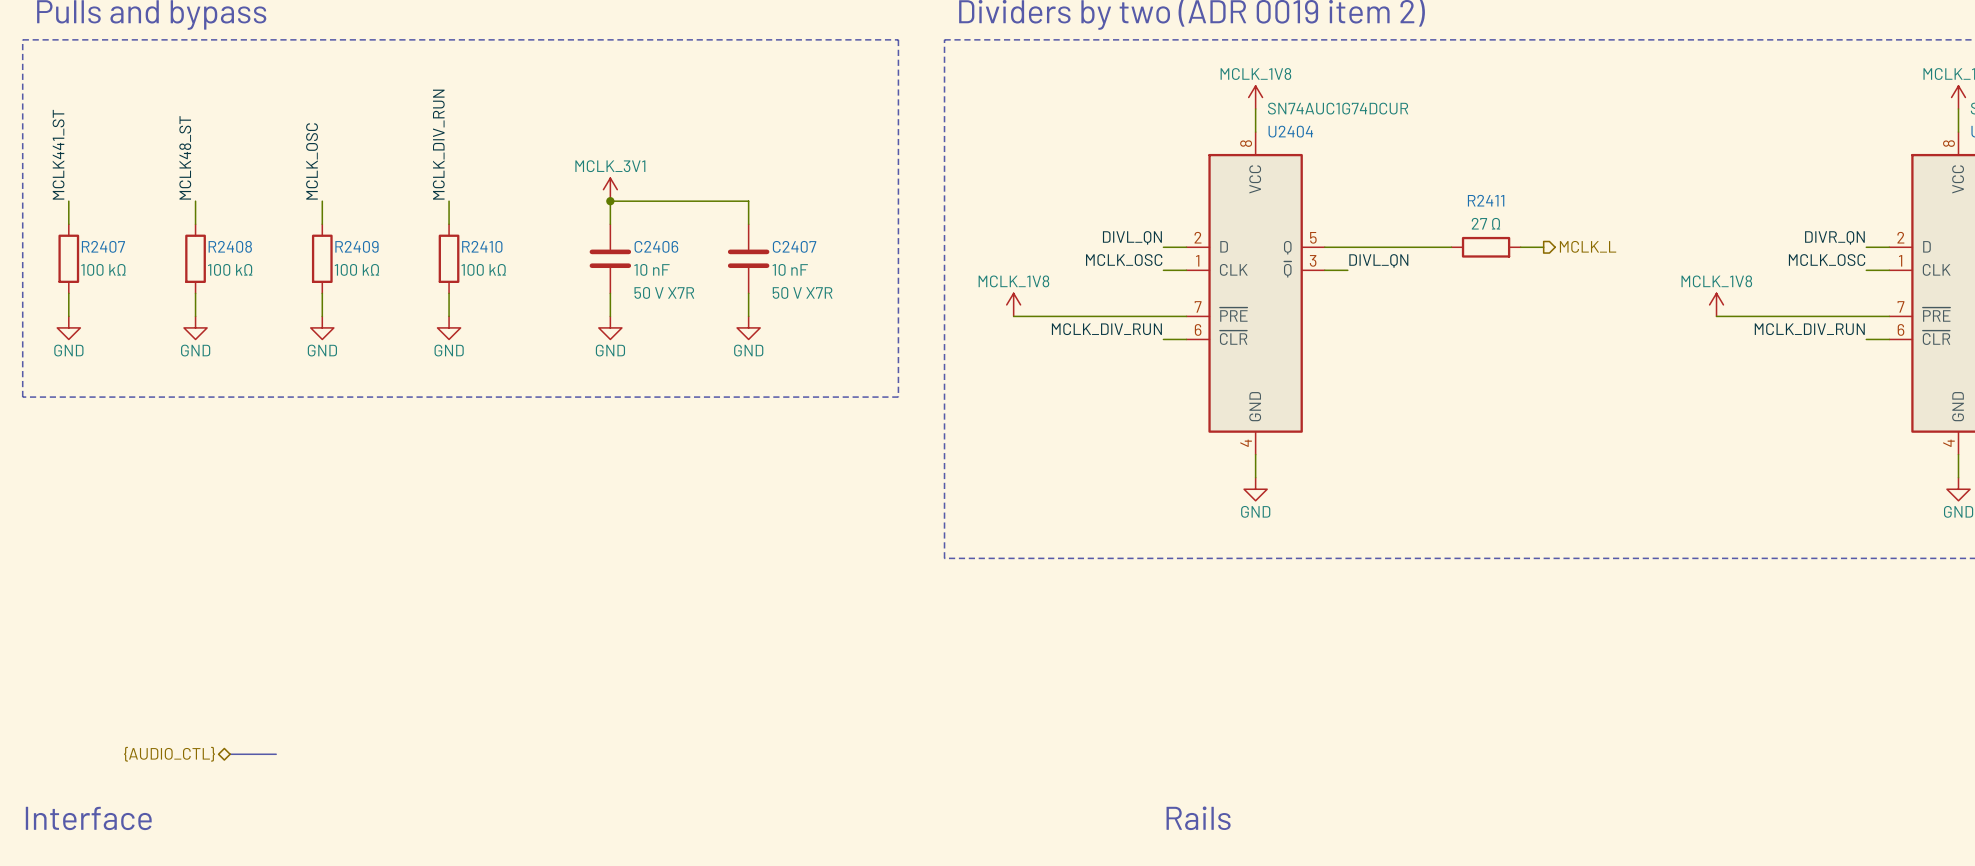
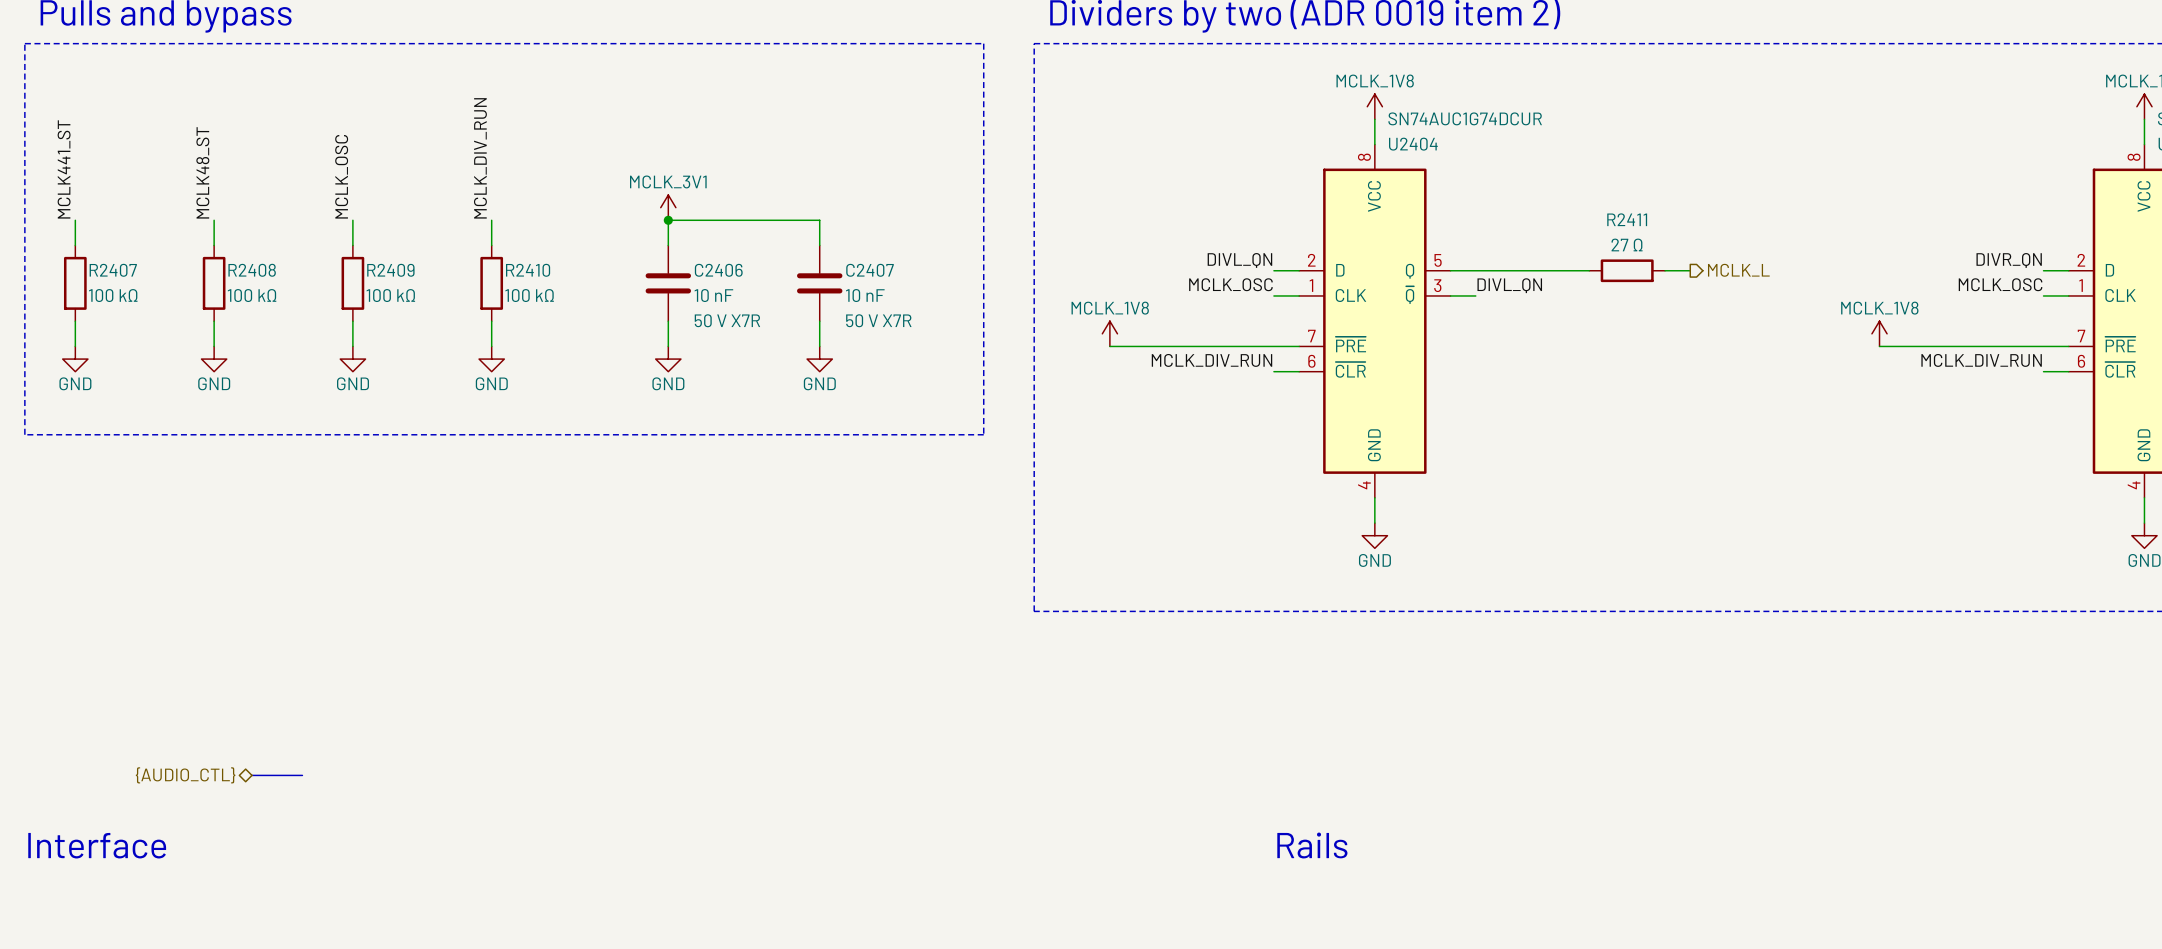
hierarchical label position: {AUDIO_CTL} (169, 754) -> {AUDIO_CTL} (185, 775)
bus: (230, 754) (276, 754) -> (251, 775) (302, 775)
text position: Interface (88, 818) -> Interface (97, 845)
text position: Rails (1198, 818) -> Rails (1312, 845)

